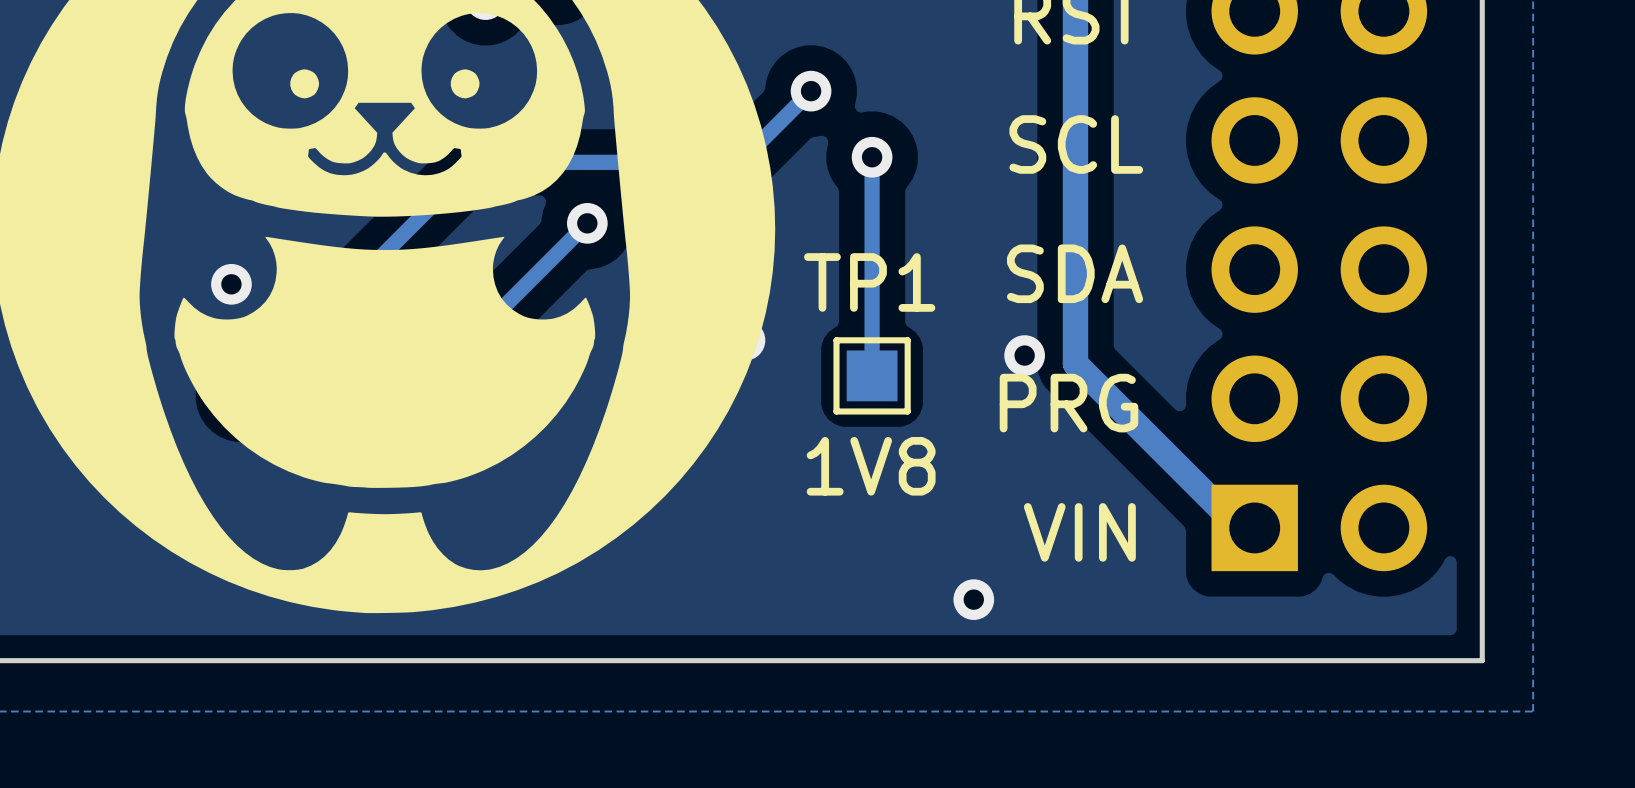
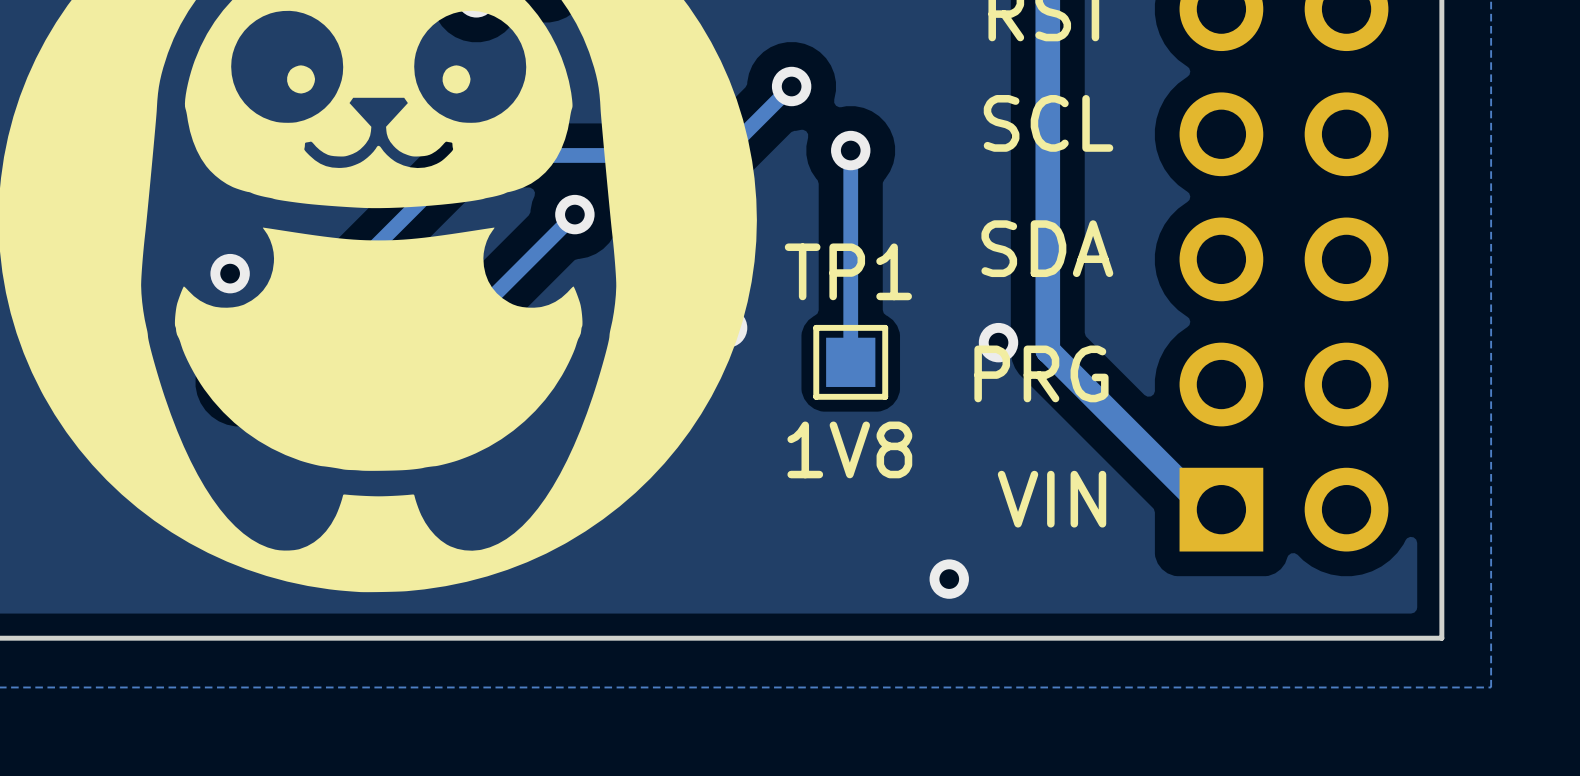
text position: SCL (1076, 144) -> SCL (1048, 123)
text position: SDA (1075, 273) -> SDA (1047, 248)
text position: PRG (1068, 403) -> PRG (1041, 373)
text position: VIN (1079, 532) -> VIN (1052, 499)

